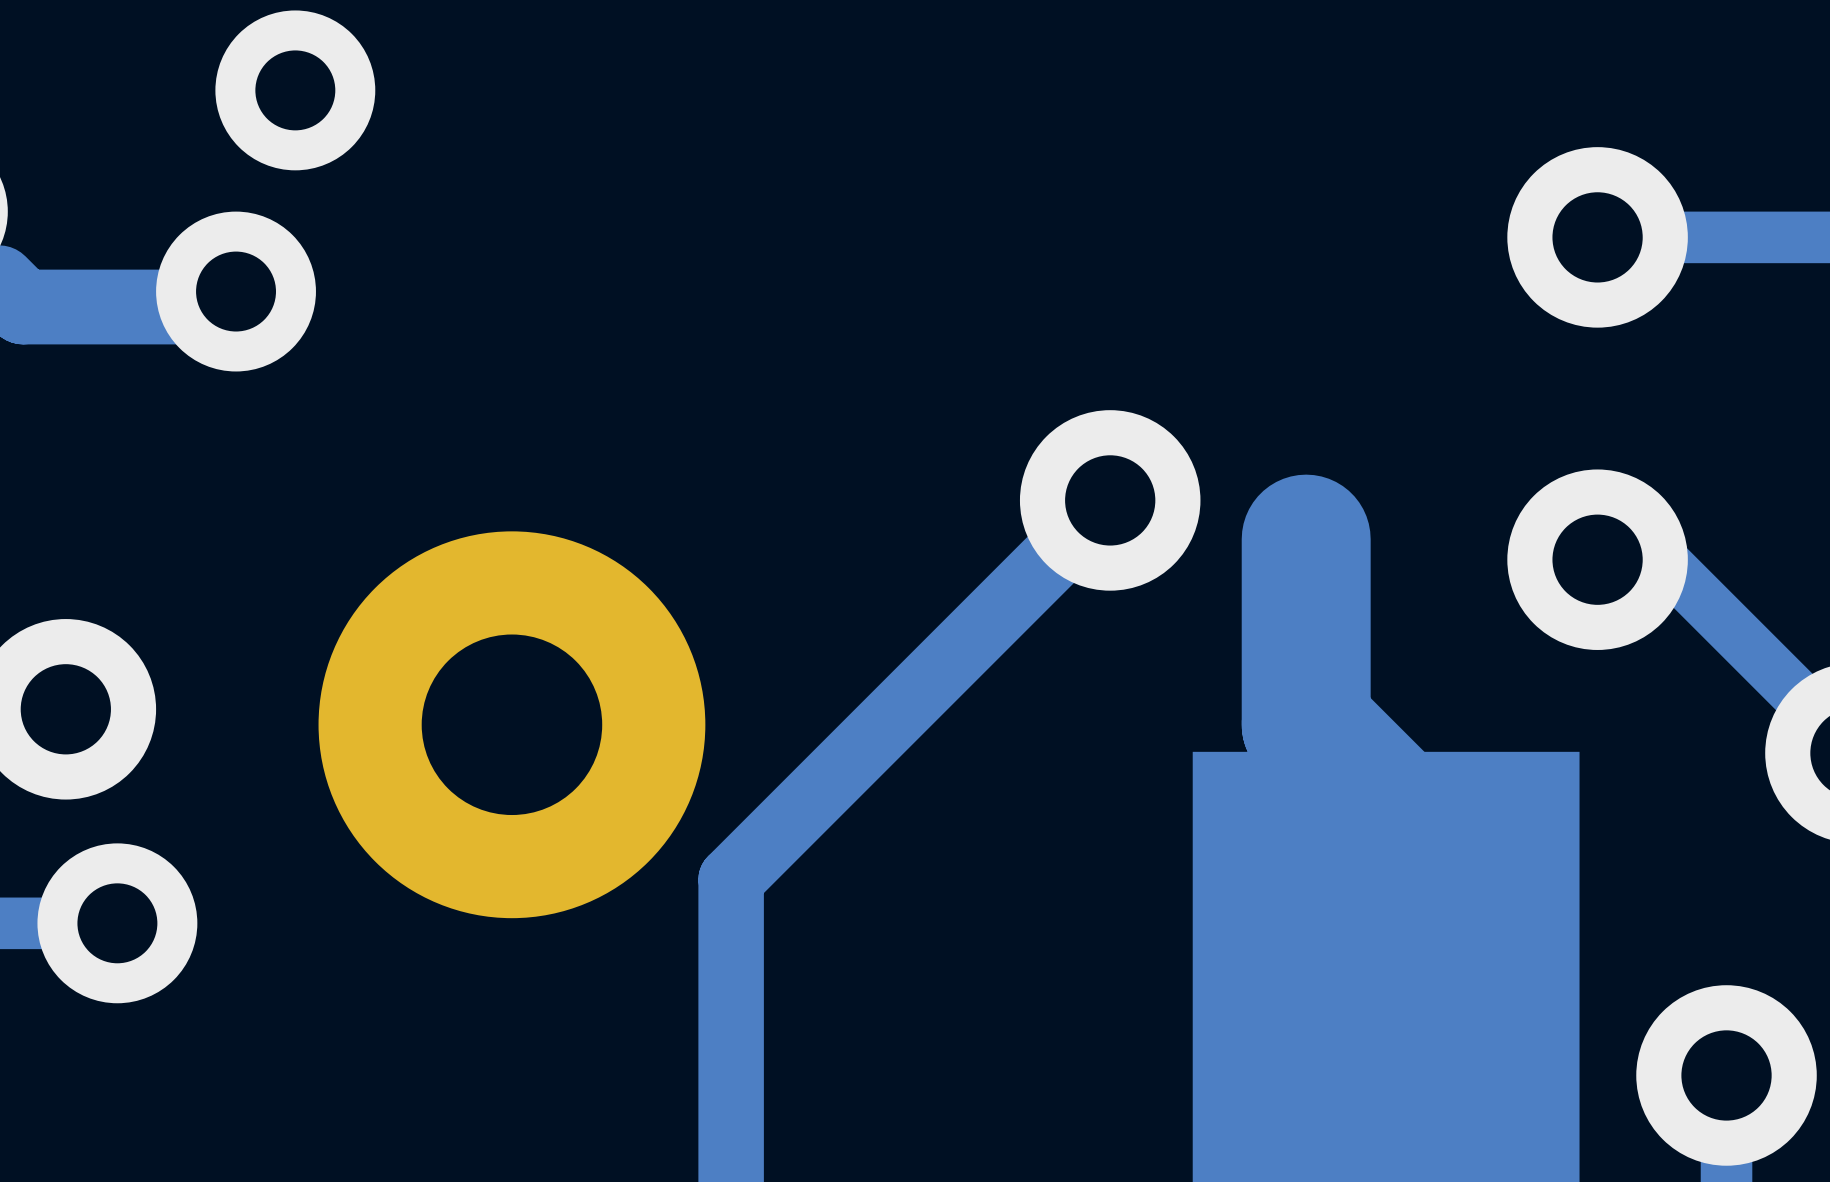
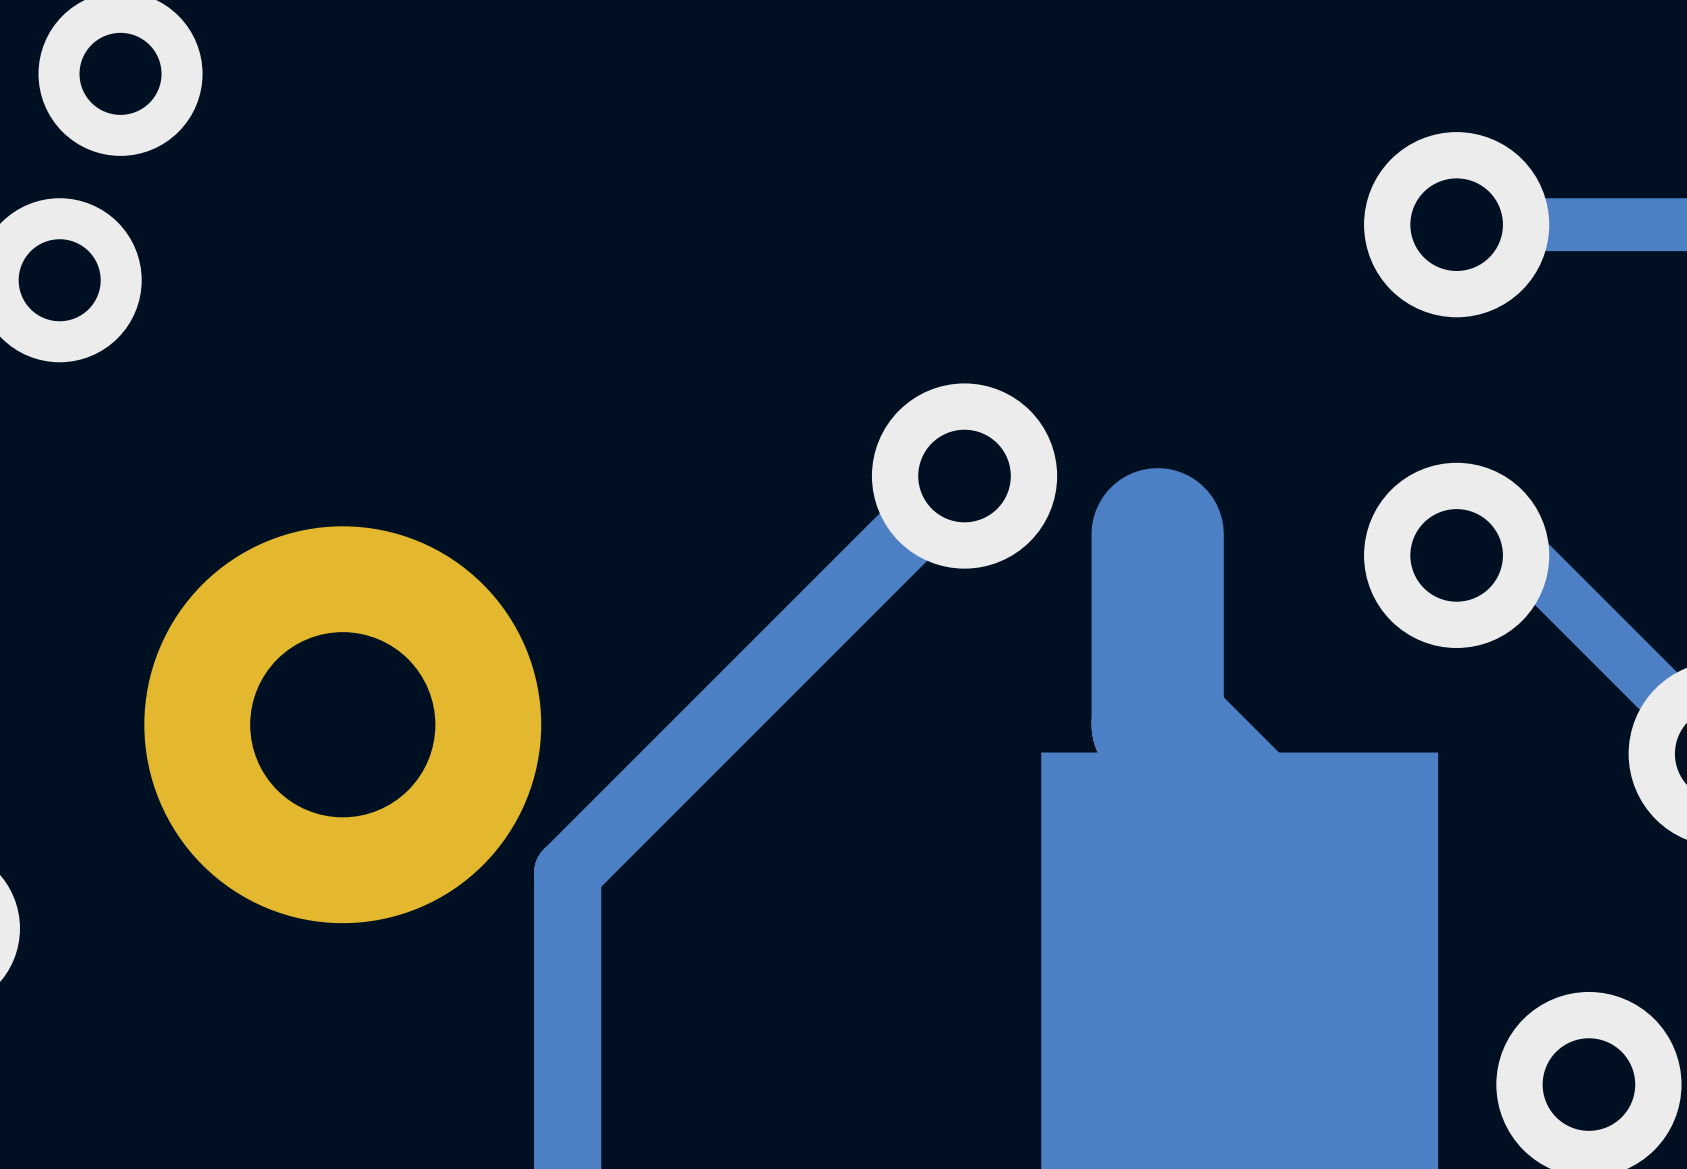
track: (1110, 500) (731, 879) -> (964, 476) (567, 872) (567, 883)
via position: (1110, 500) -> (964, 476)

